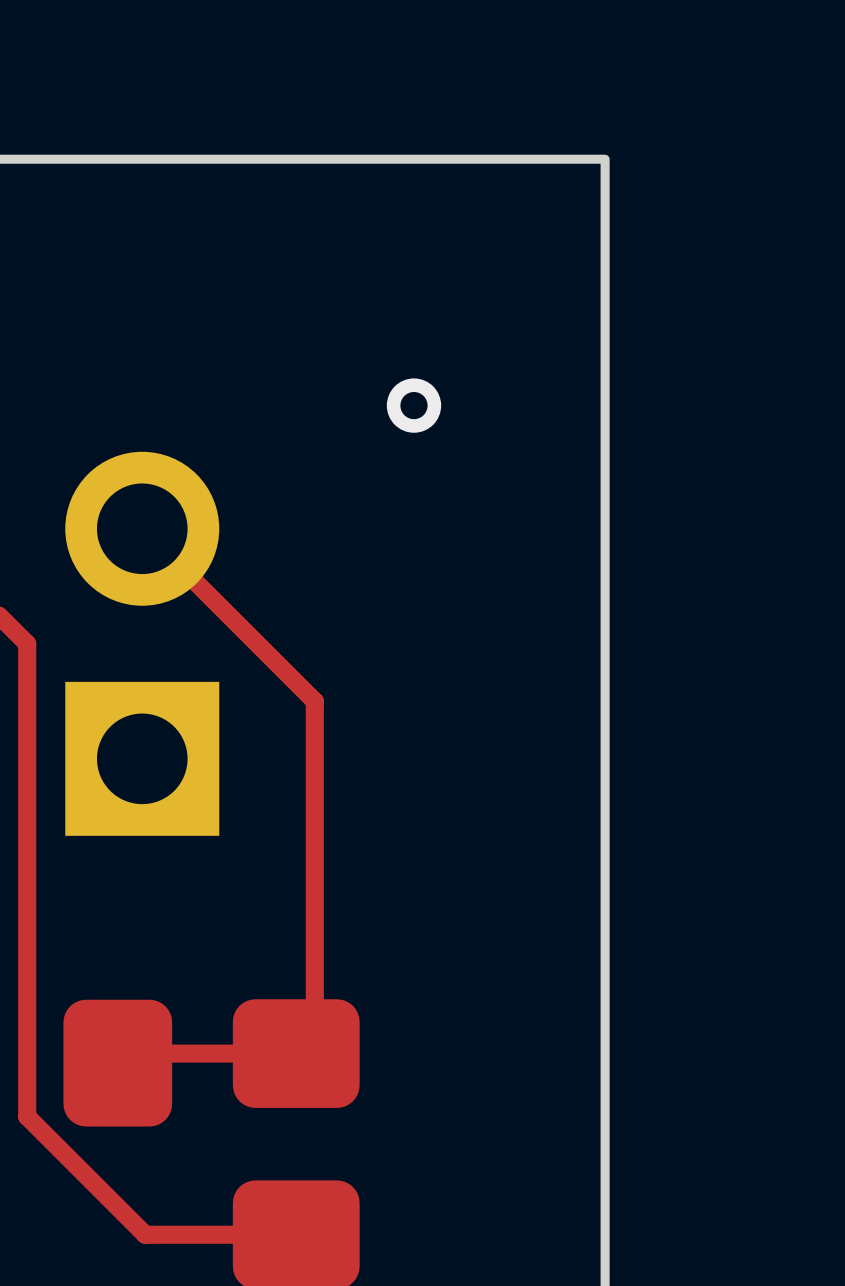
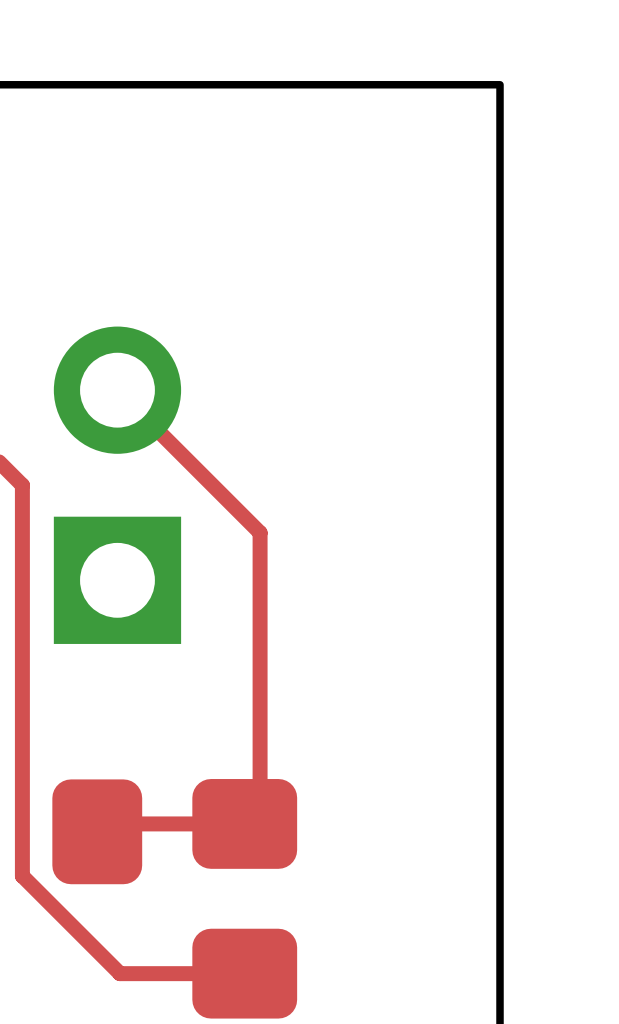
via: (413, 405) -> none

